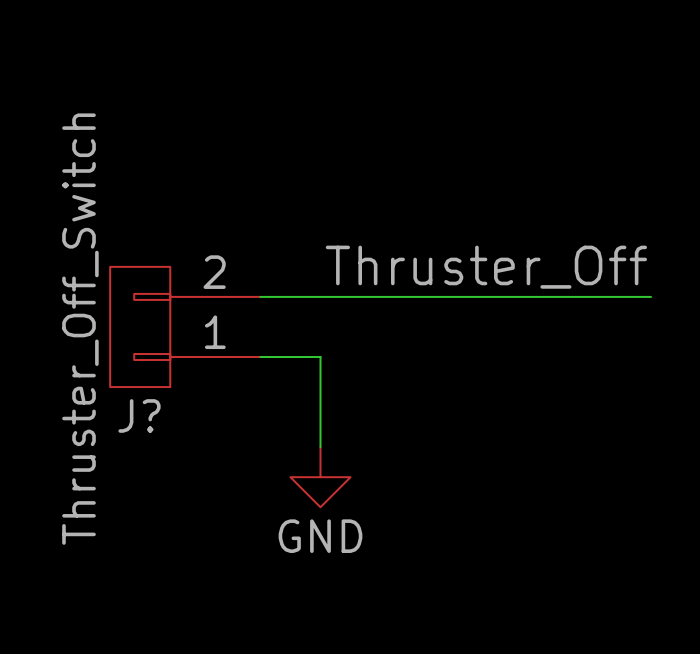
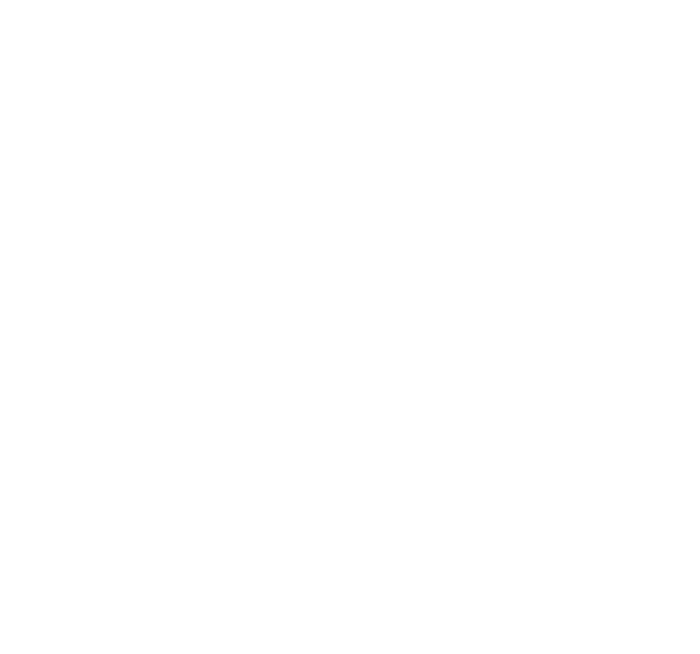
label: Thruster_Off (486, 267) -> none
wire: (260, 296) (651, 296) -> none
J?: Thruster_Off_Switch (185, 326) -> none
wire: (260, 357) (320, 357) (320, 447) -> none
power symbol: GND (320, 477) -> none

